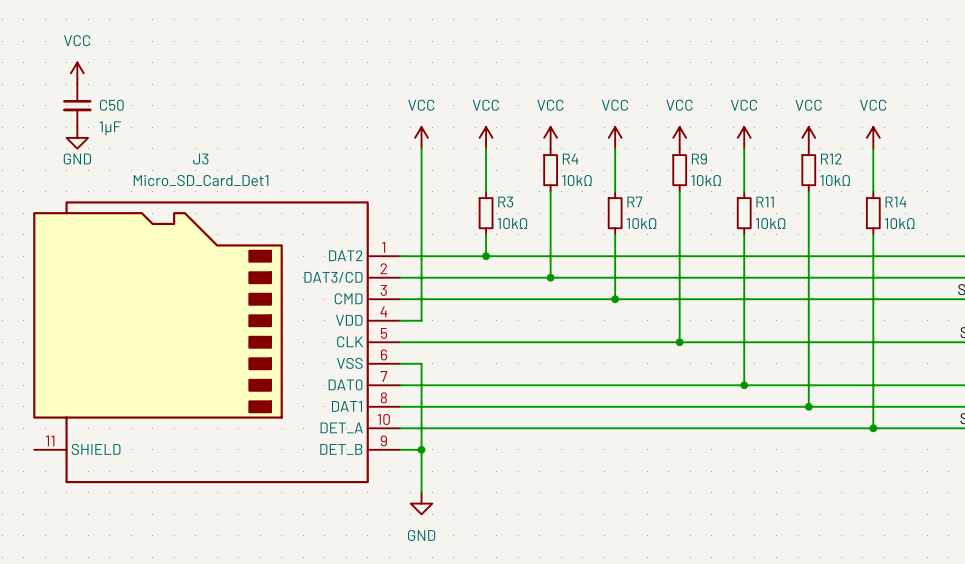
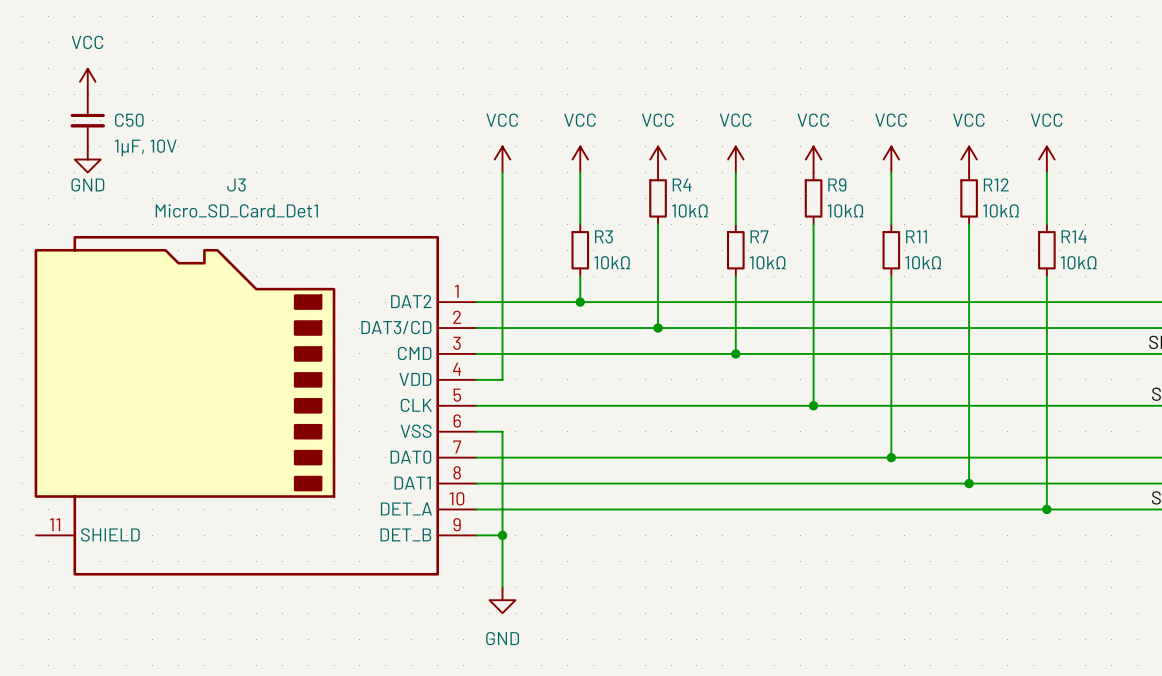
C50 value: 1µF (110, 128) -> 1µF, 10V (145, 147)

